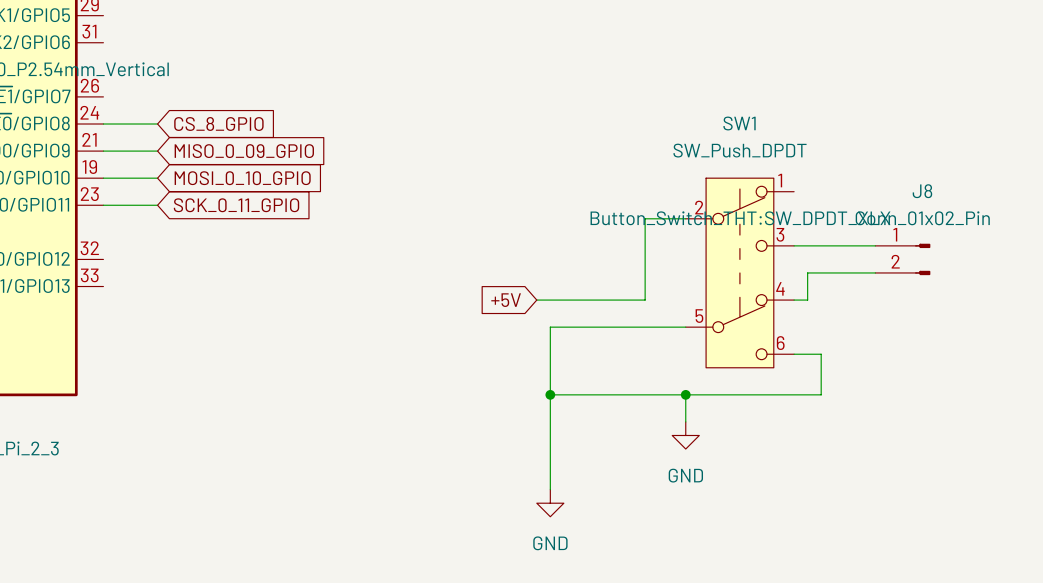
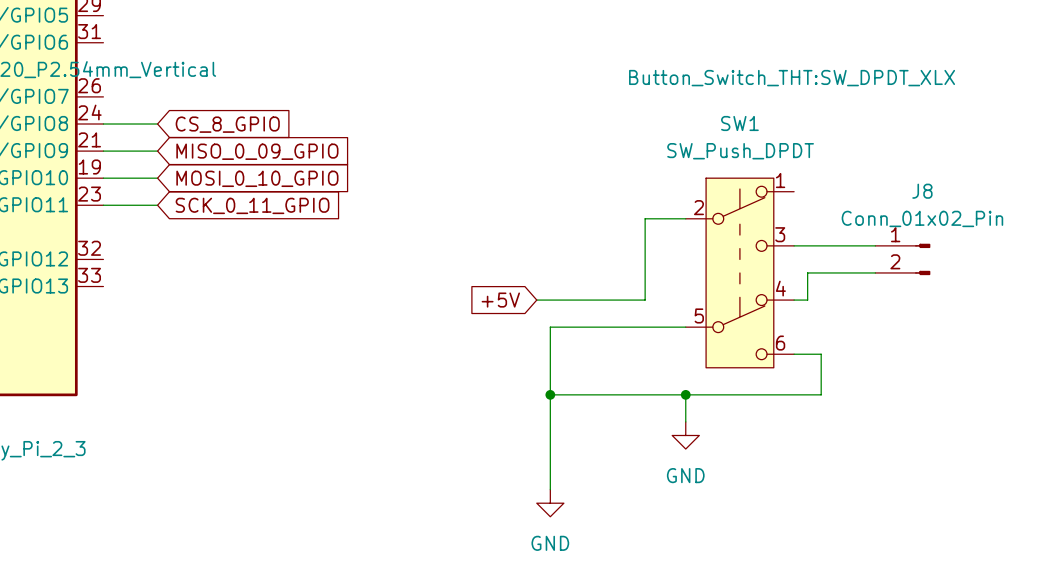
SW1 text position: Button_Switch_THT:SW_DPDT_XLX (740, 218) -> Button_Switch_THT:SW_DPDT_XLX (792, 78)

